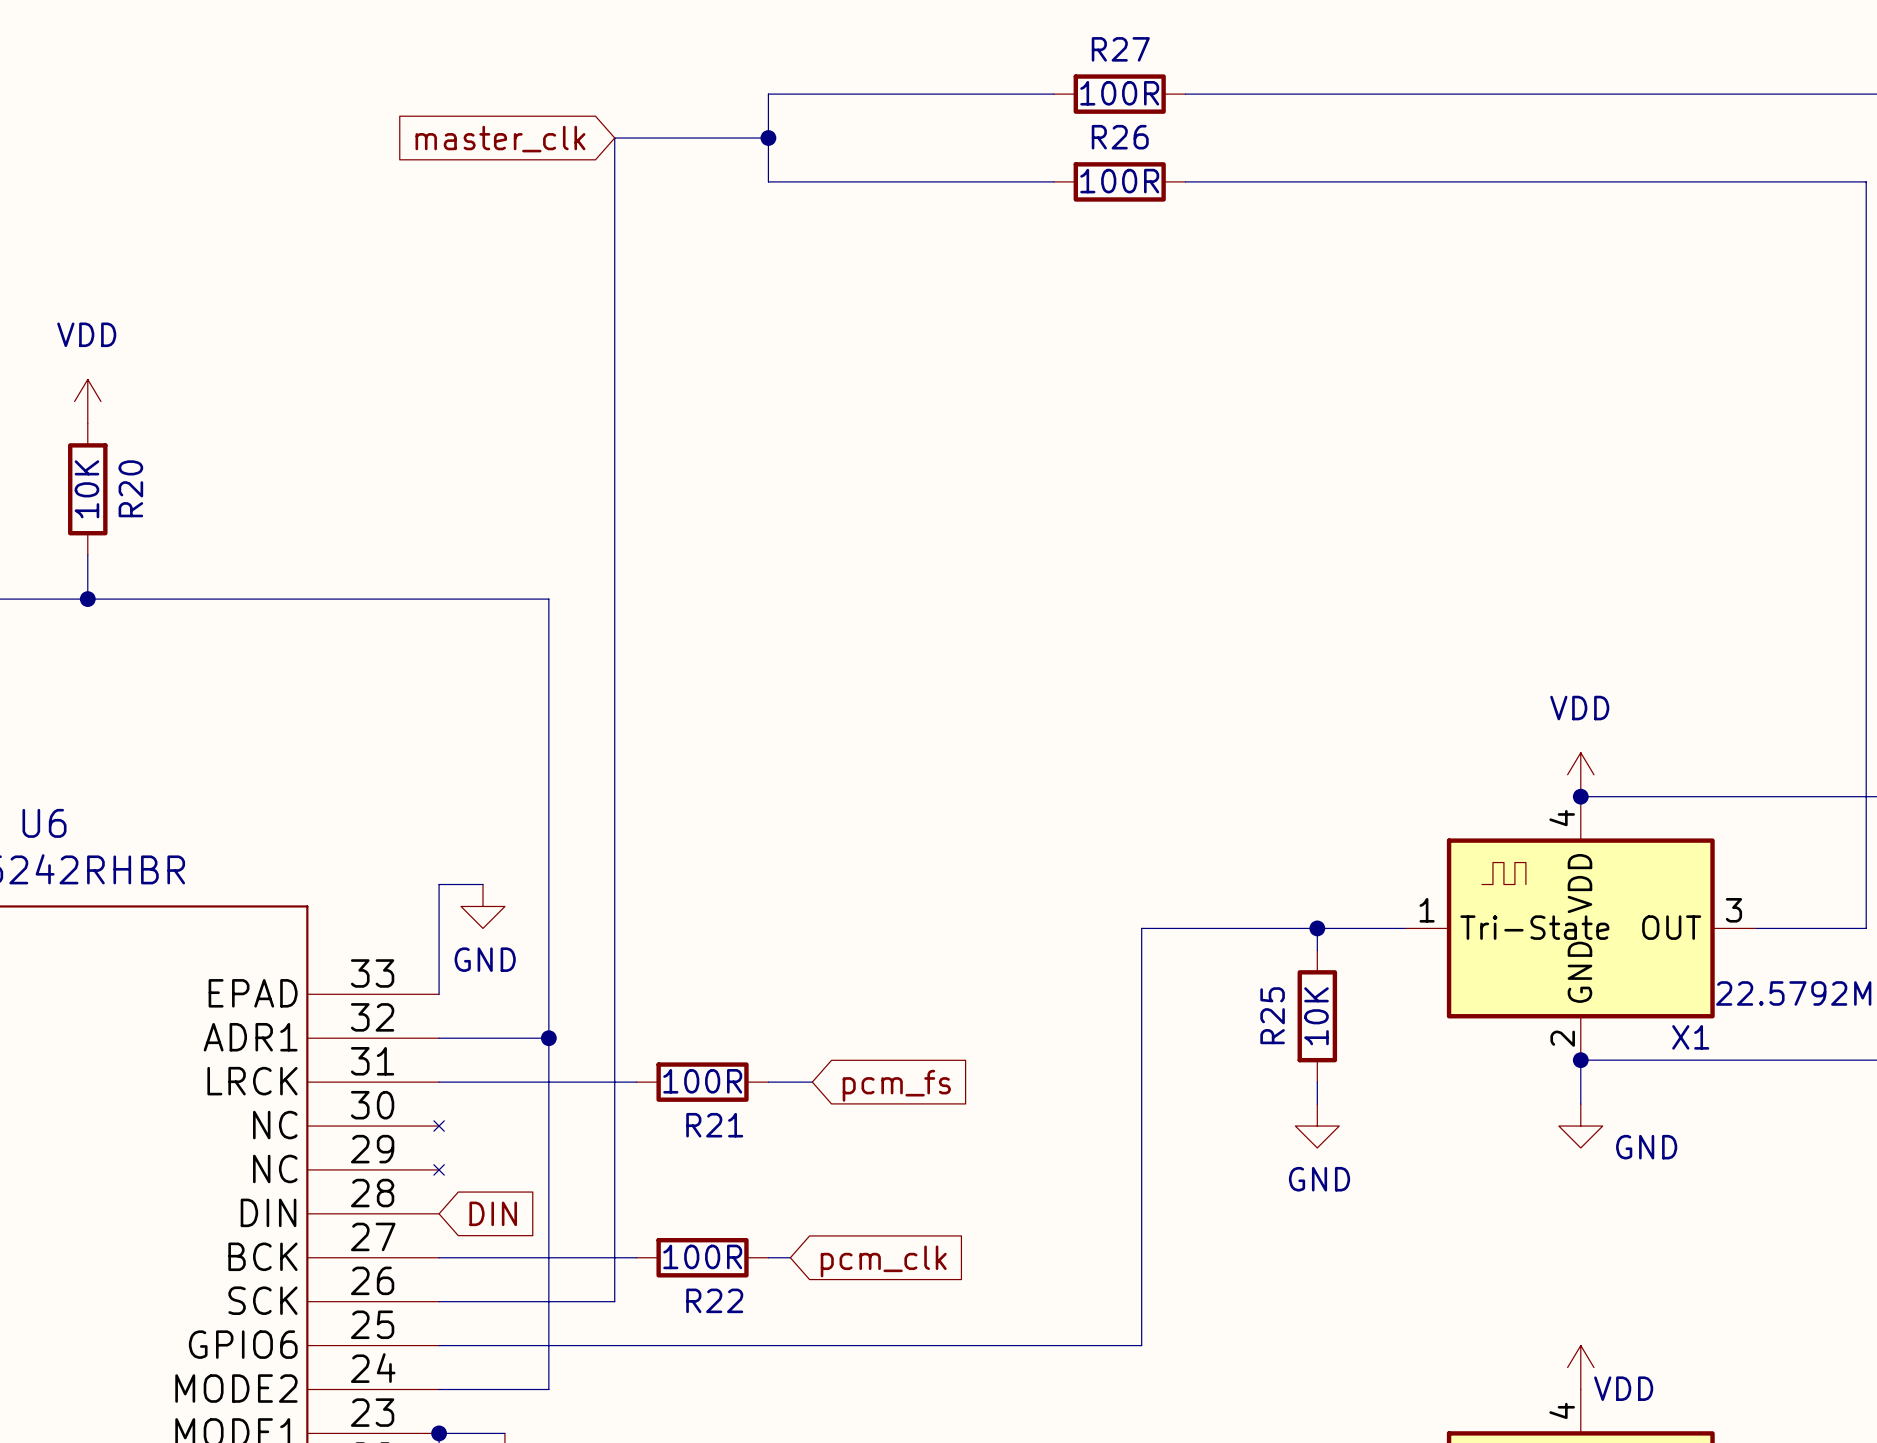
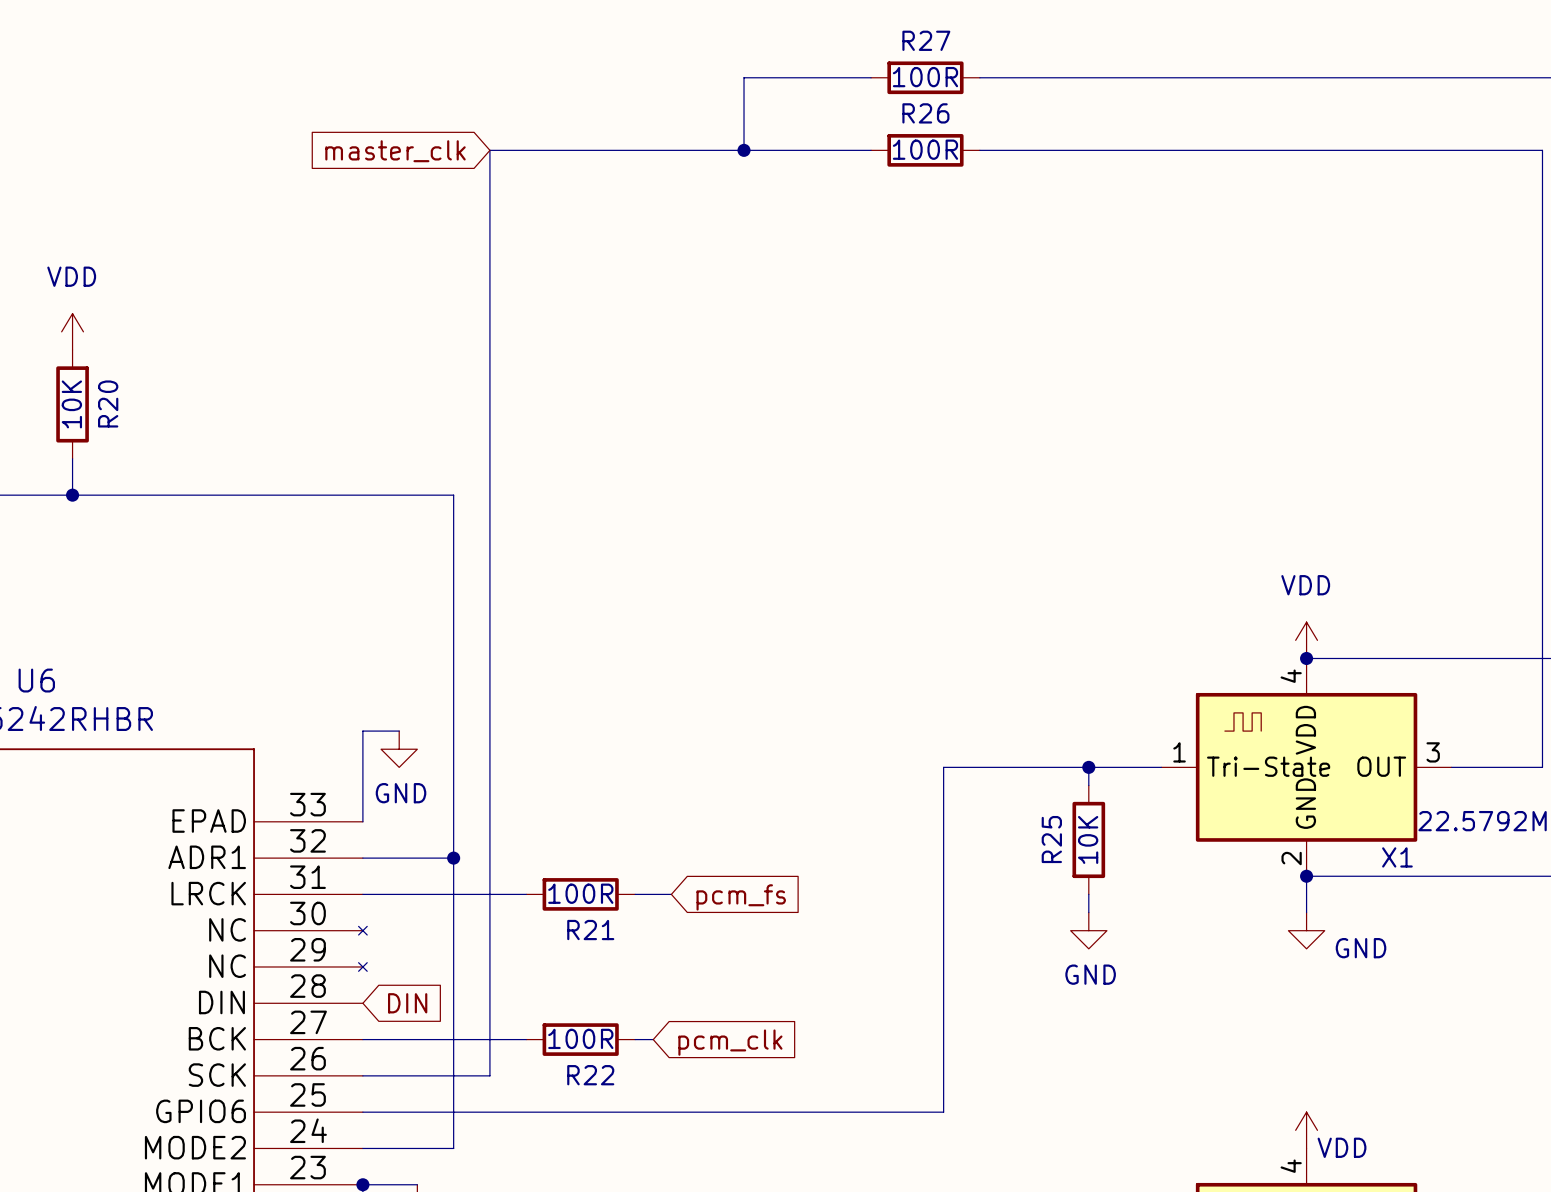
wire: (900, 94) (768, 94) (768, 181) -> (744, 77) (744, 150)
wire: (768, 138) (614, 138) (614, 1301) (592, 1301) -> (635, 150) (489, 150) (489, 1075)
junction: (768, 138) -> none
global label position: master_clk (500, 139) -> master_clk (395, 151)
junction: none -> (744, 150)

